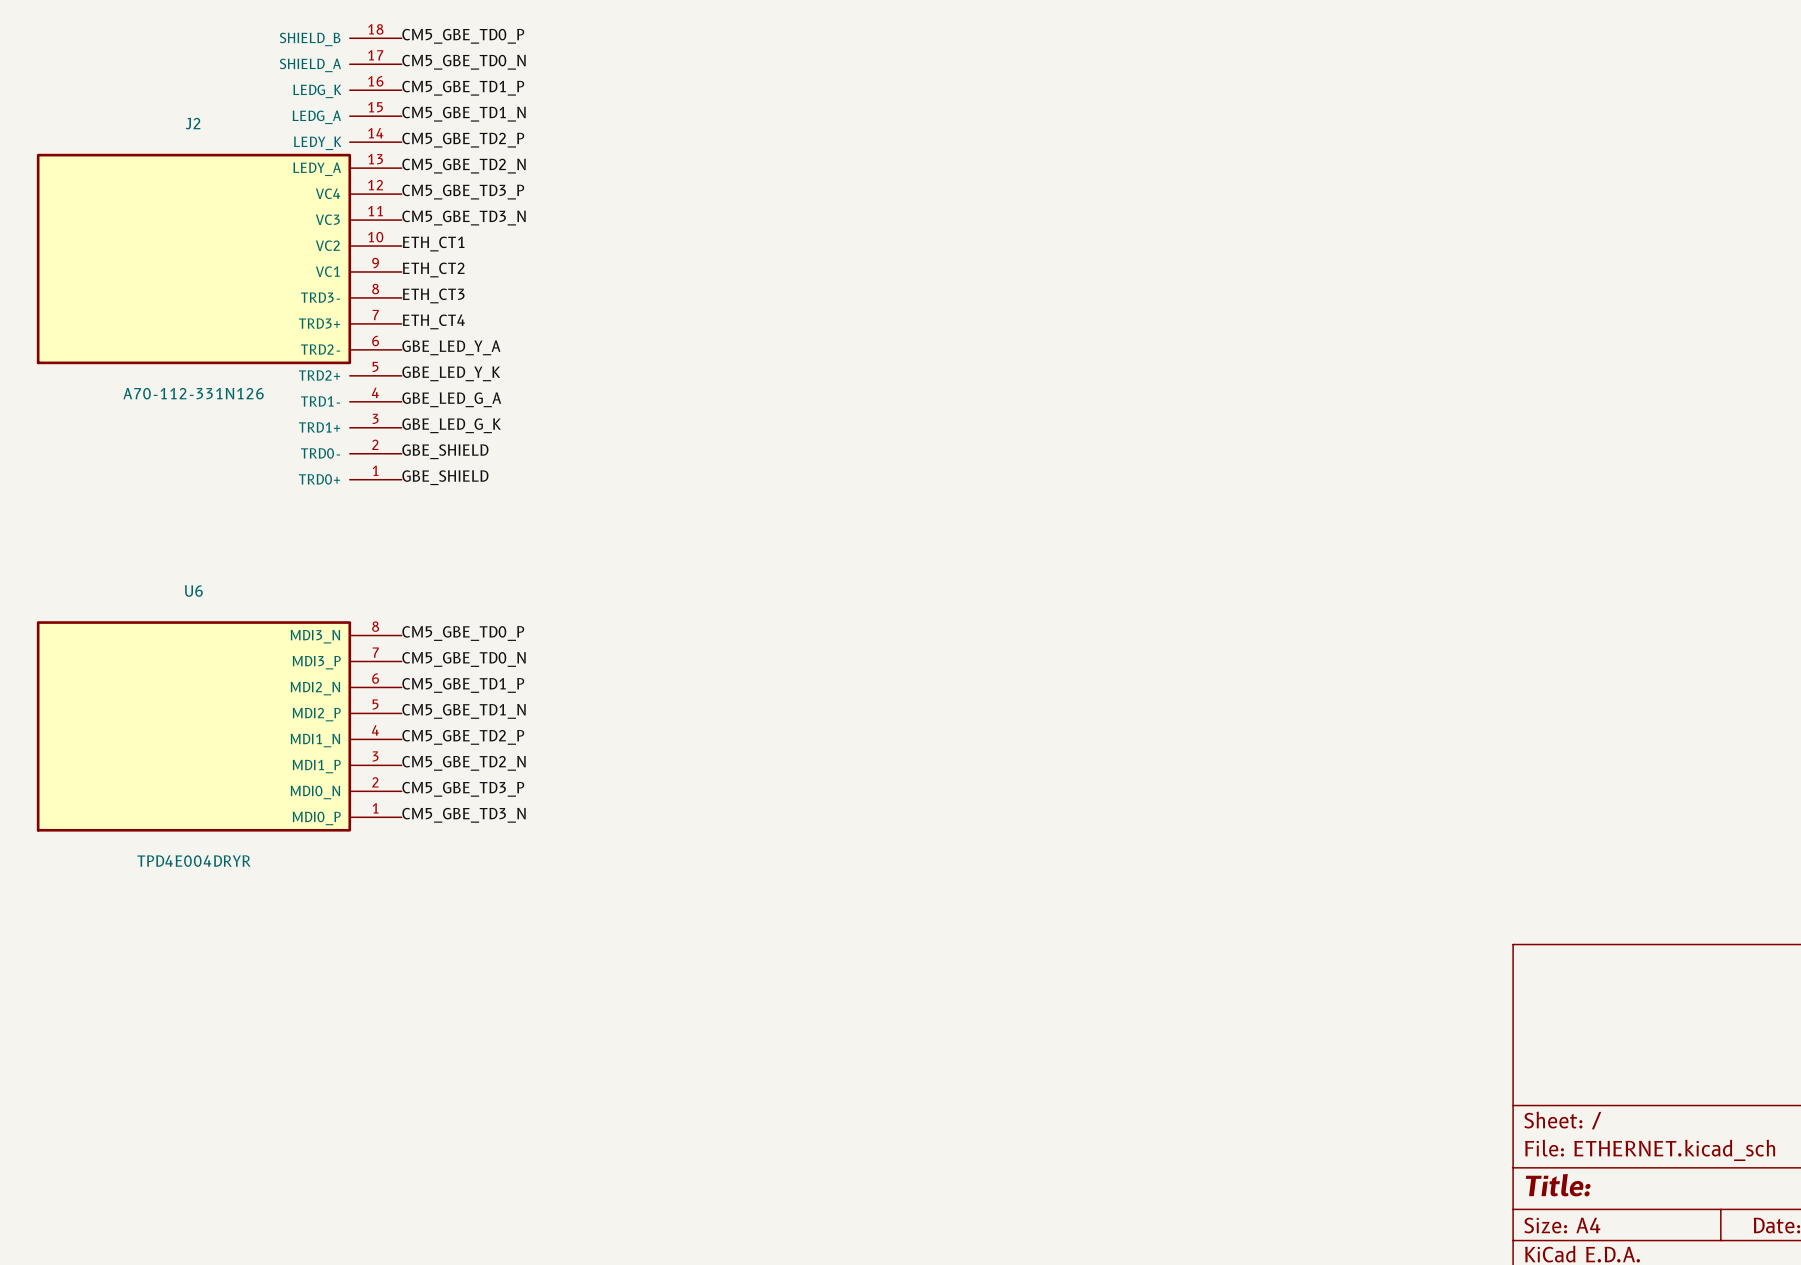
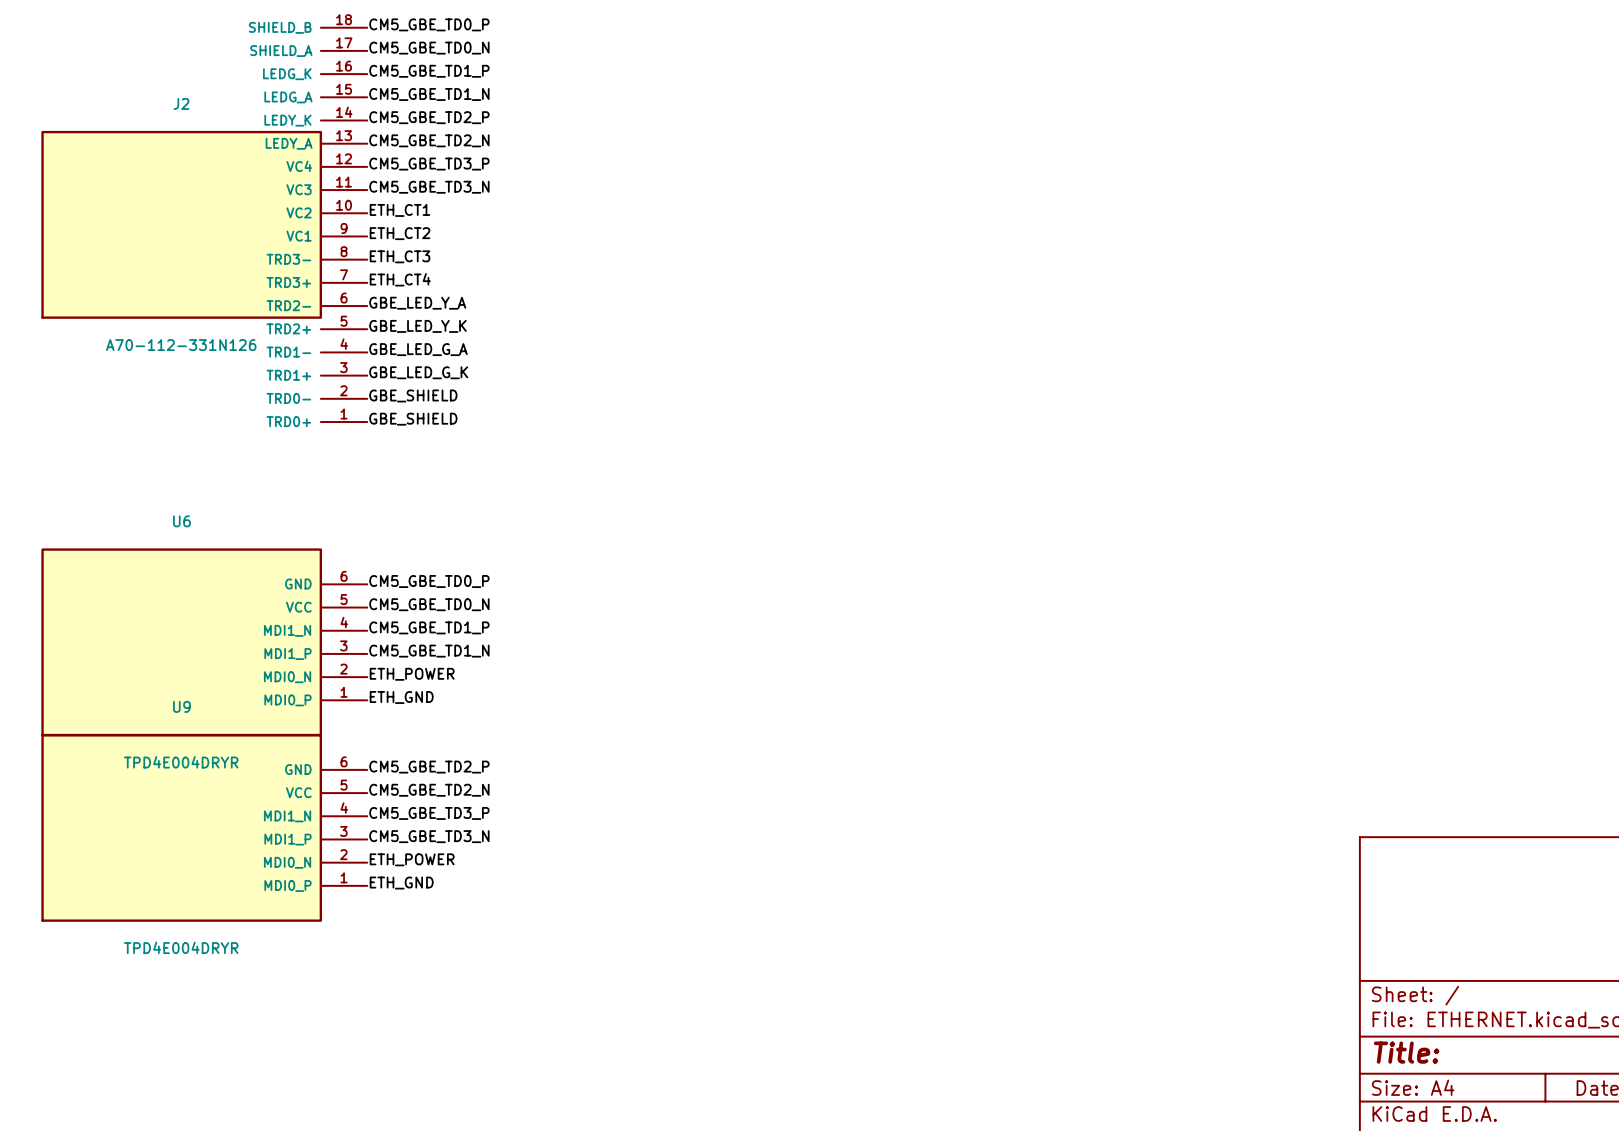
U6 symbol: [36, 621, 402, 832] -> [41, 548, 368, 737]
label: CM5_GBE_TD0_P (463, 633) -> none
label: CM5_GBE_TD0_N (464, 659) -> CM5_GBE_TD0_P (429, 581)
label: CM5_GBE_TD1_P (463, 685) -> CM5_GBE_TD0_N (429, 604)
label: CM5_GBE_TD1_N (464, 711) -> CM5_GBE_TD1_P (429, 627)
label: CM5_GBE_TD2_P (463, 737) -> CM5_GBE_TD1_N (429, 651)
label: CM5_GBE_TD2_N (464, 763) -> ETH_POWER (412, 674)
label: CM5_GBE_TD3_P (463, 789) -> ETH_GND (401, 697)
label position: CM5_GBE_TD3_N (464, 815) -> CM5_GBE_TD3_N (429, 836)
label: none -> CM5_GBE_TD2_P (429, 767)
label: none -> CM5_GBE_TD2_N (429, 790)
label: none -> CM5_GBE_TD3_P (429, 813)
U9: none -> TPD4E004DRYR (204, 827)
label: none -> ETH_POWER (412, 859)
label: none -> ETH_GND (401, 883)

